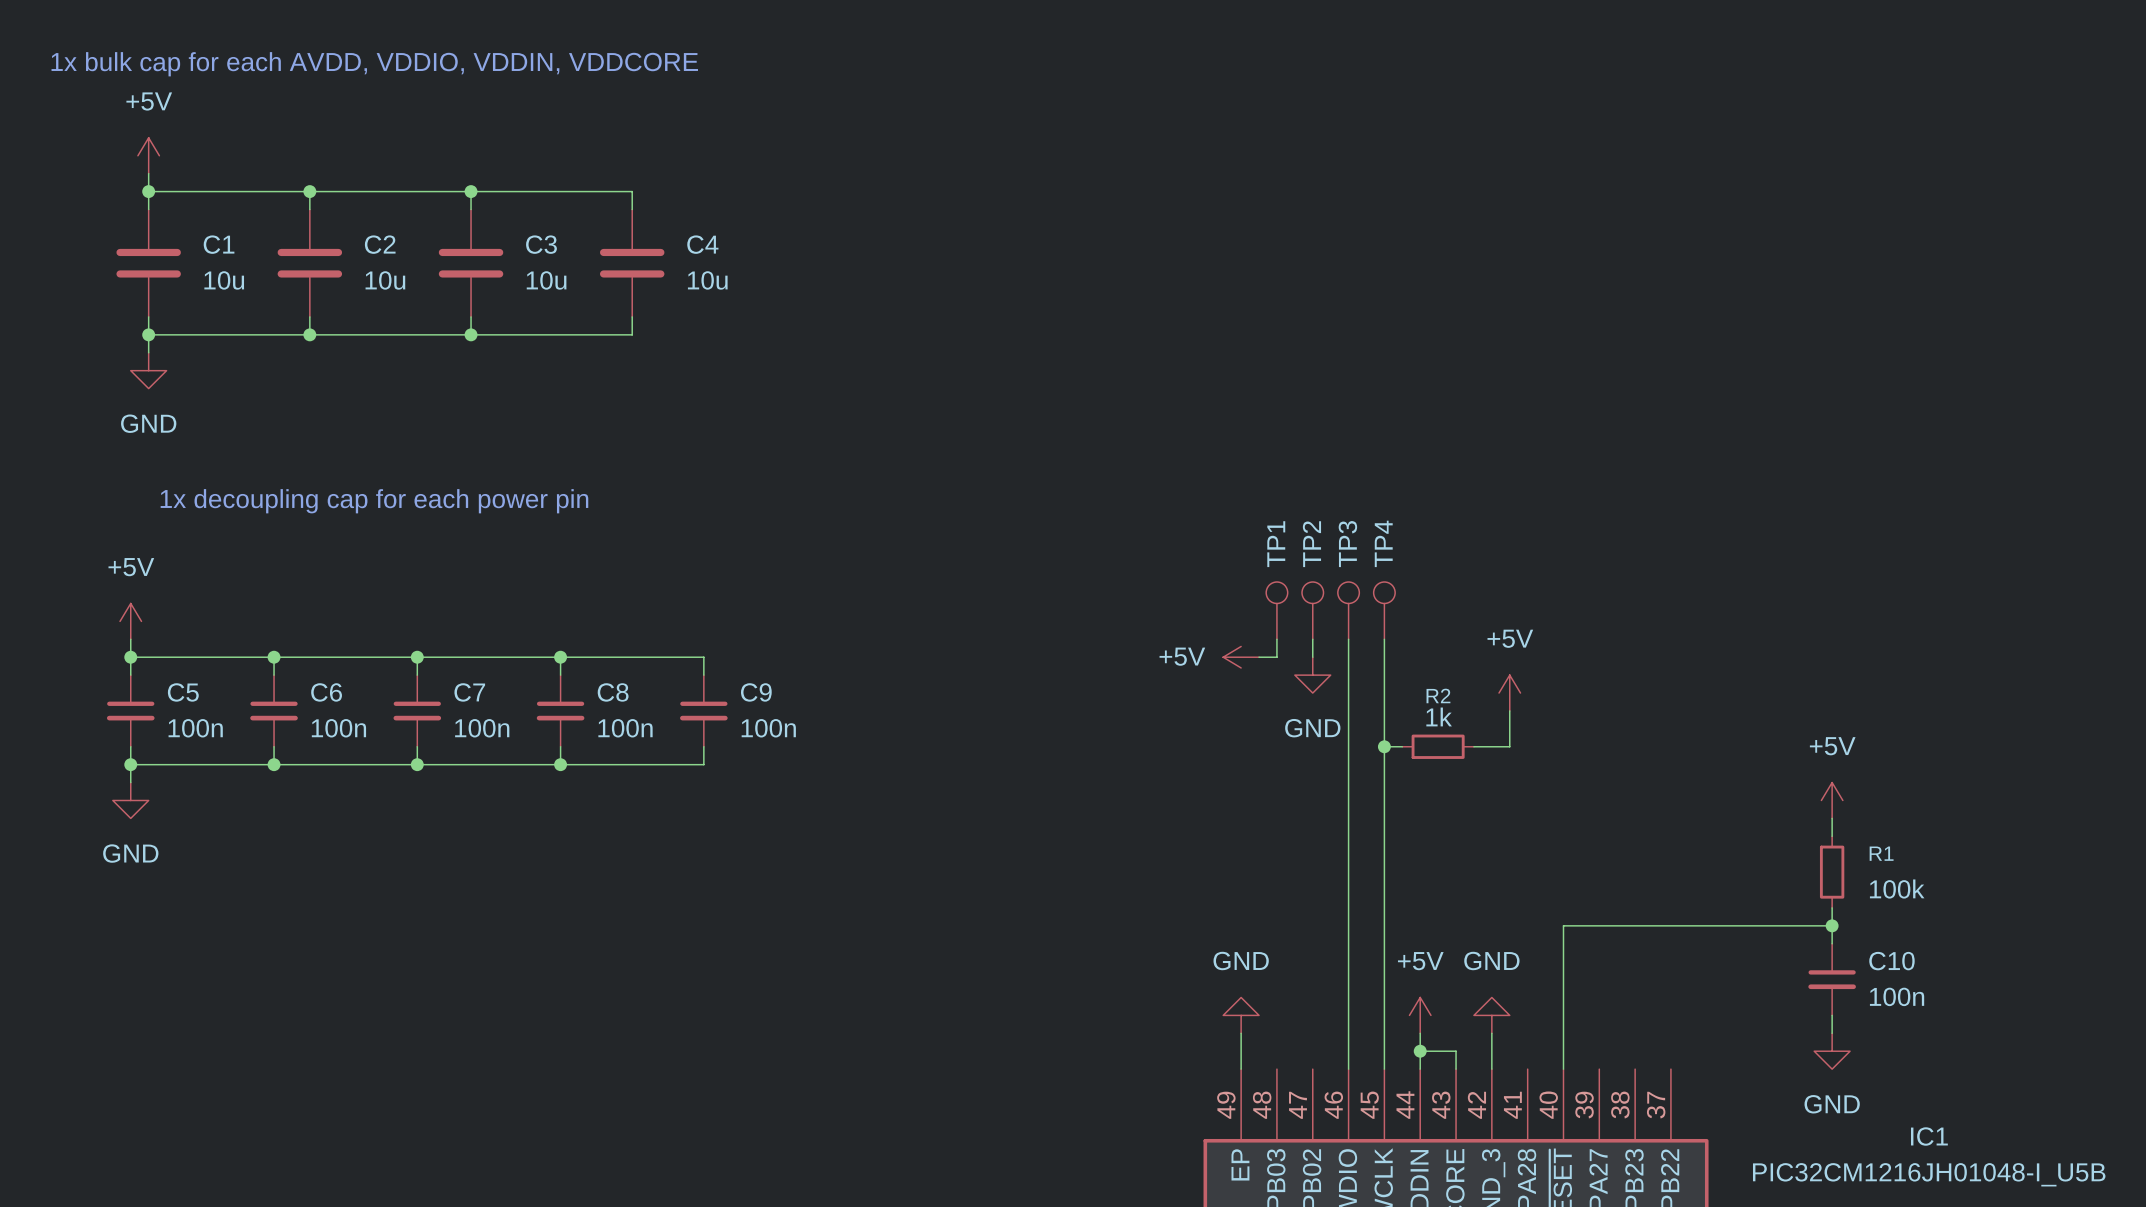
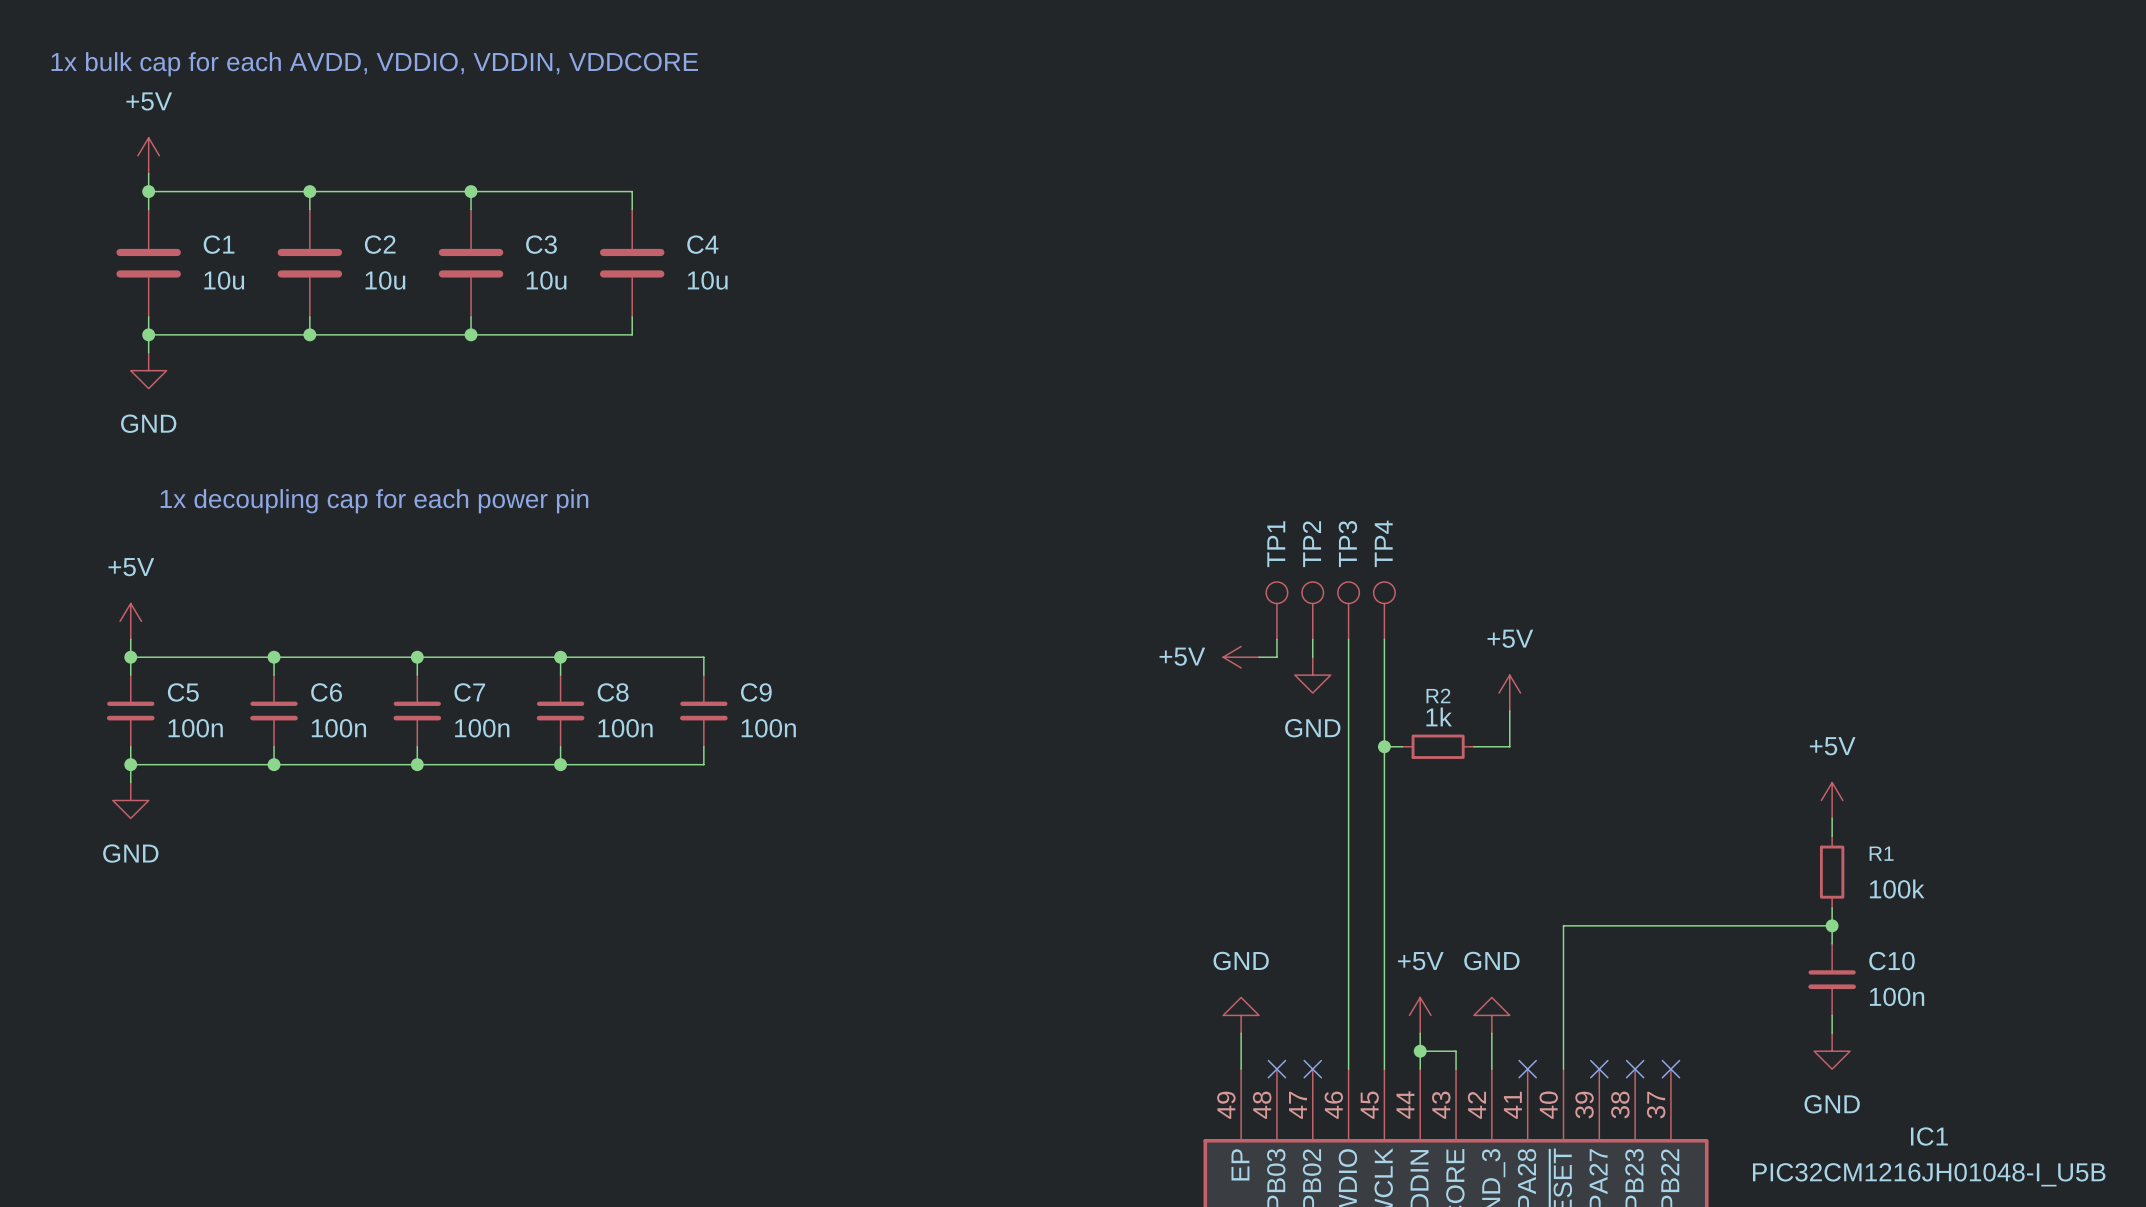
no-connect mark: none -> (1276, 1069)
no-connect mark: none -> (1312, 1069)
no-connect mark: none -> (1527, 1069)
no-connect mark: none -> (1599, 1069)
no-connect mark: none -> (1635, 1069)
no-connect mark: none -> (1670, 1069)

